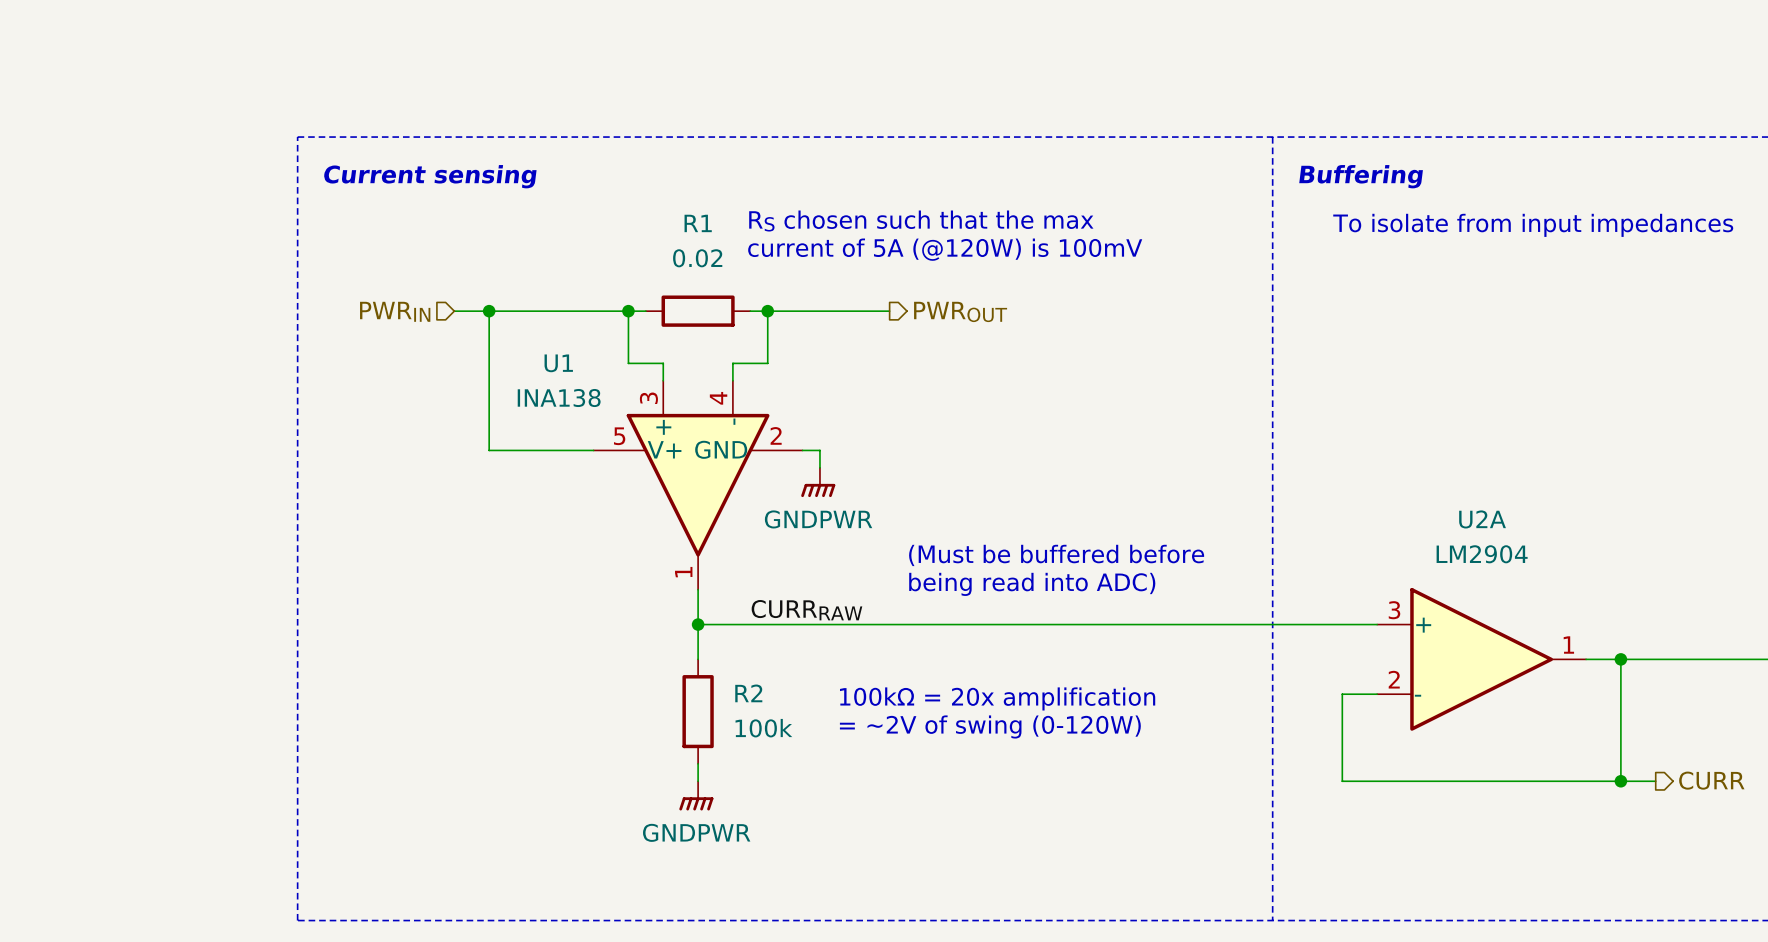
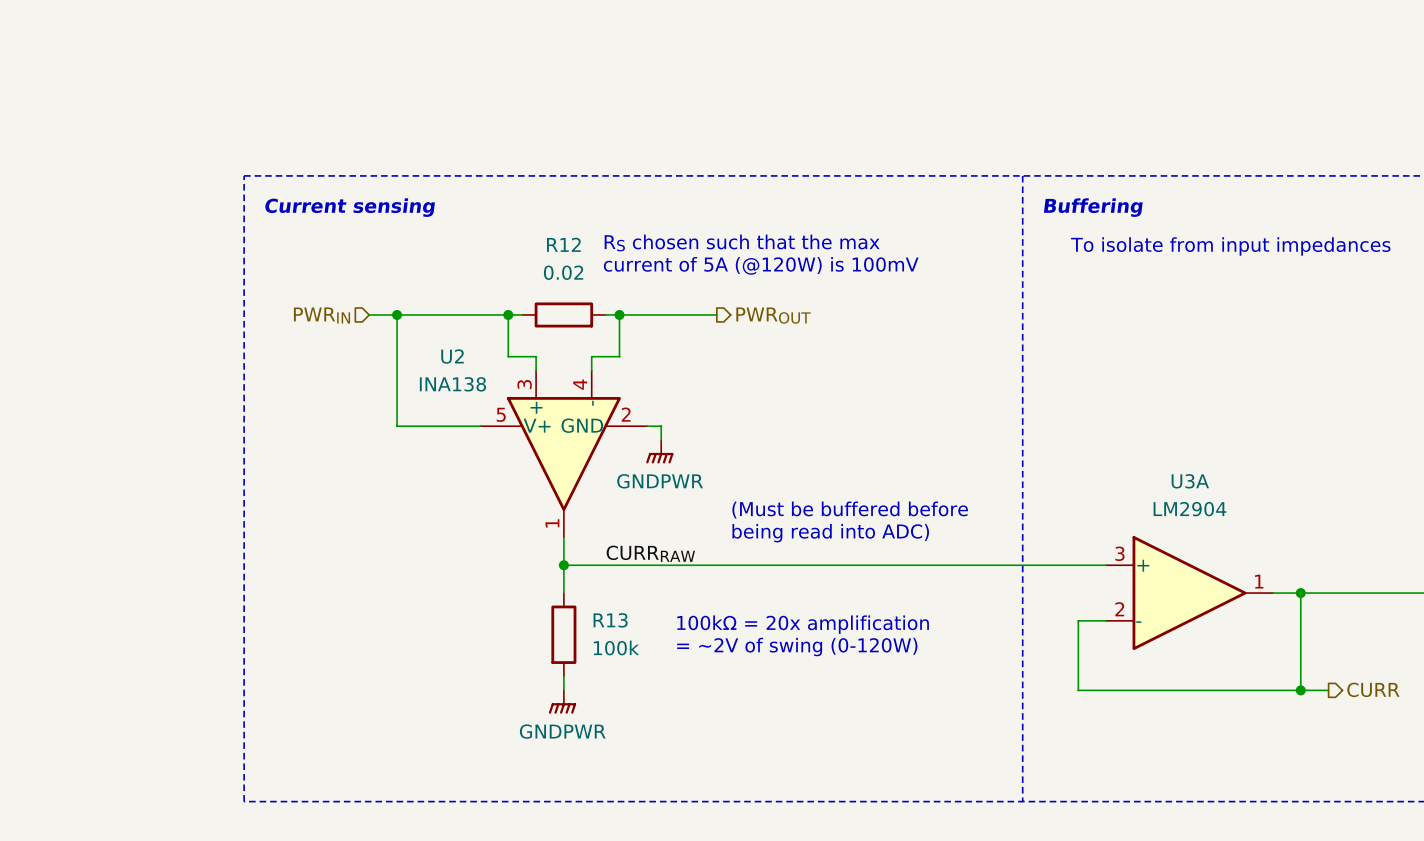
R1 name: R1 (698, 223) -> R12 (563, 244)
U1 name: U1 (558, 363) -> U2 (452, 356)
U2A name: U2A (1482, 519) -> U3A (1190, 481)
R2 name: R2 (748, 693) -> R13 (610, 620)

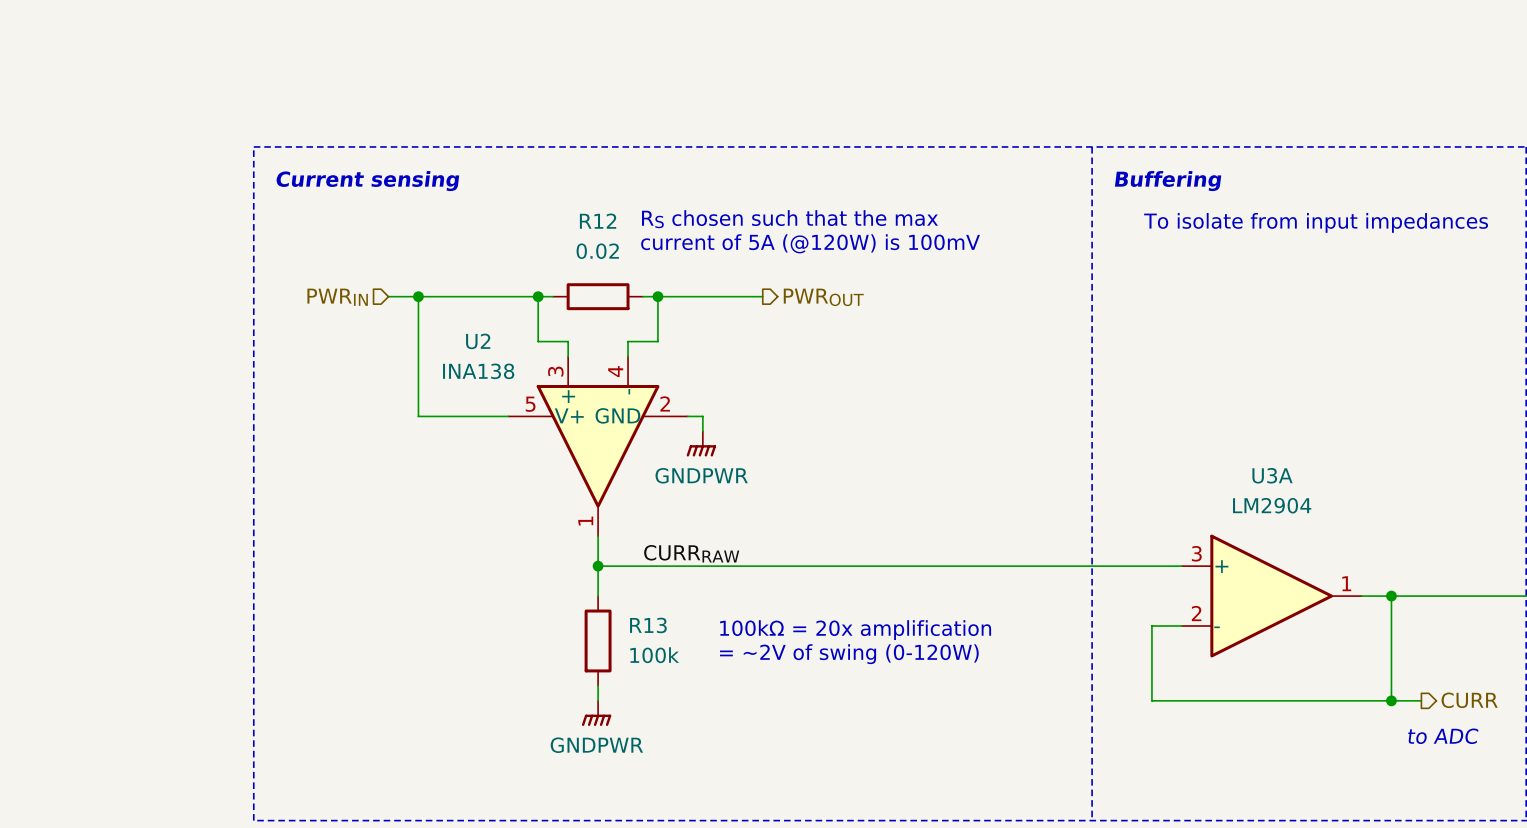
text: (Must be buffered before (850, 510) -> none
text: being read into ADC) (830, 533) -> none
text: none -> to ADC (1443, 736)

